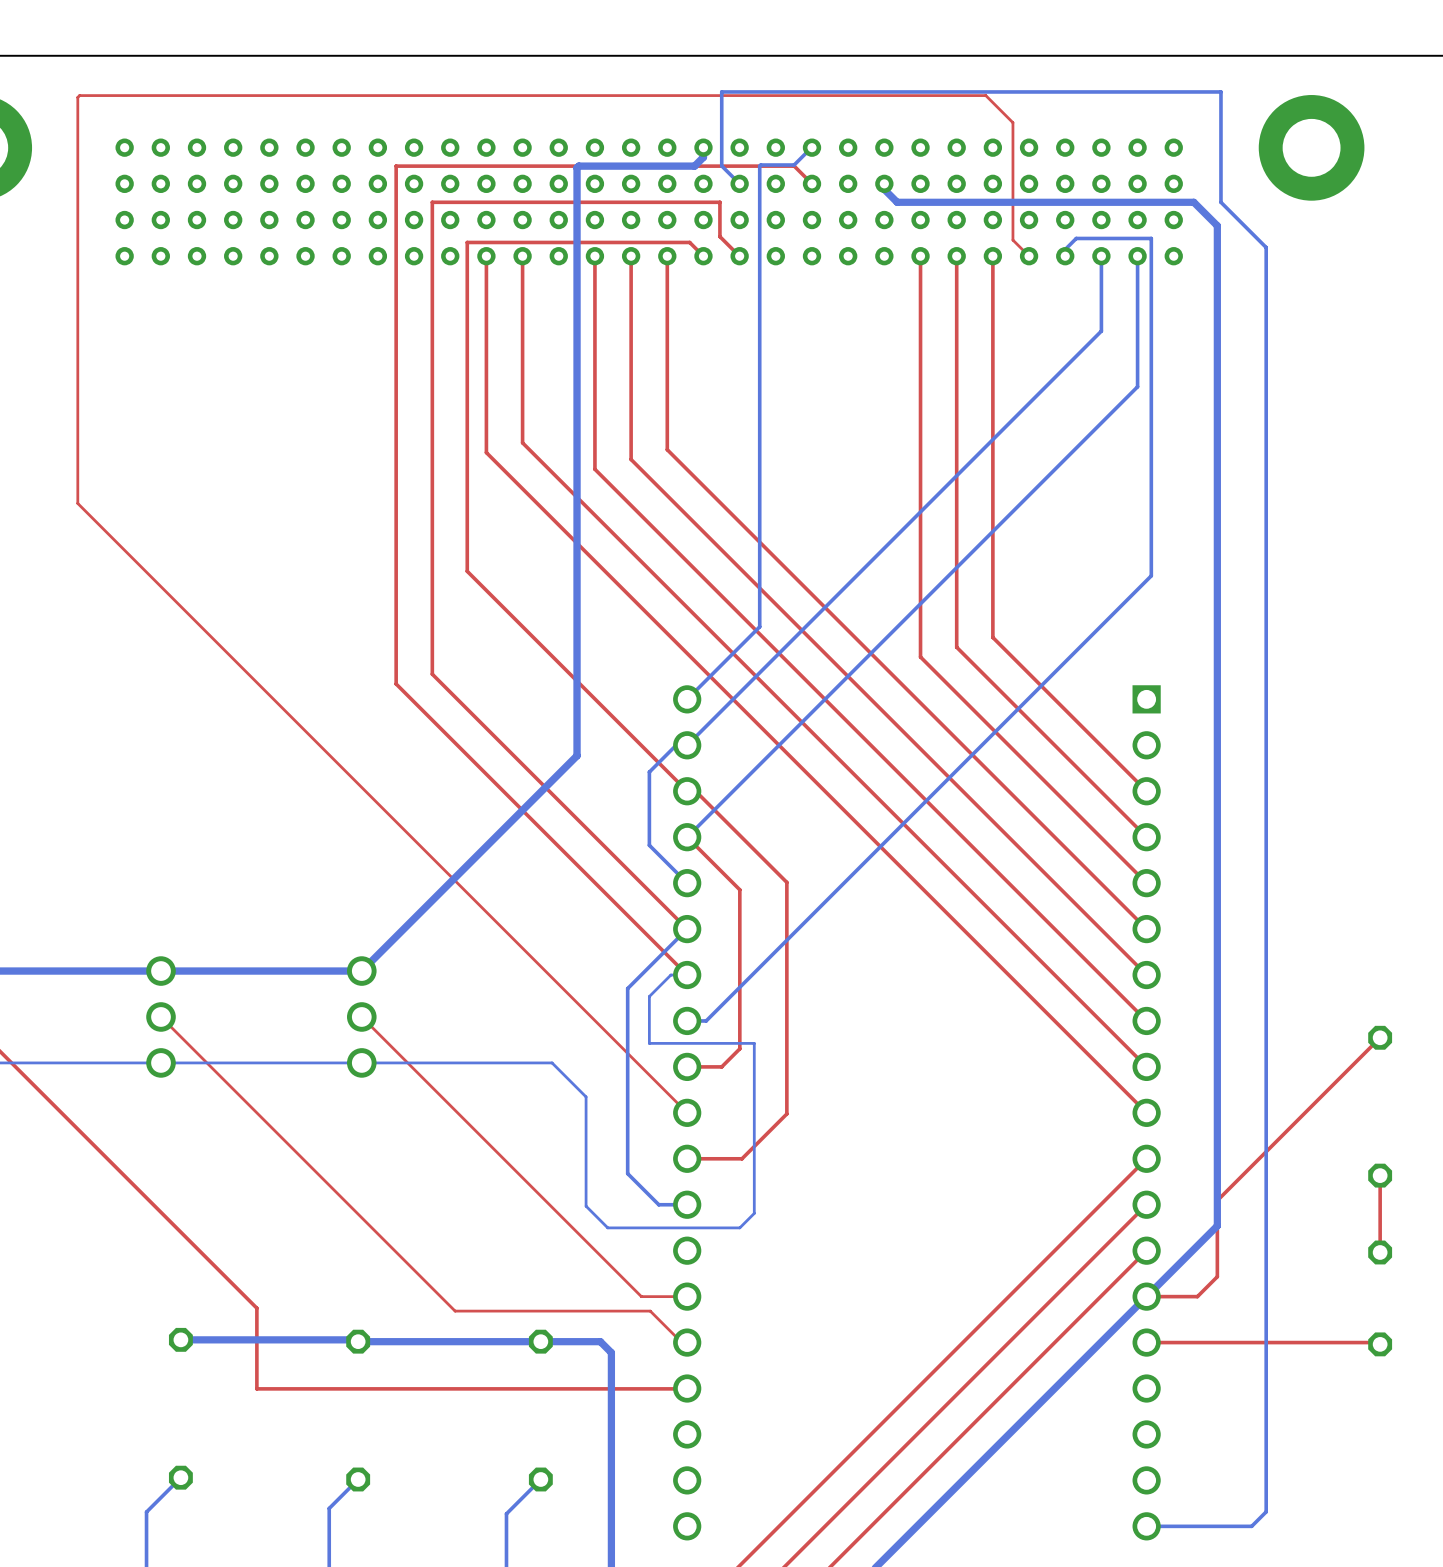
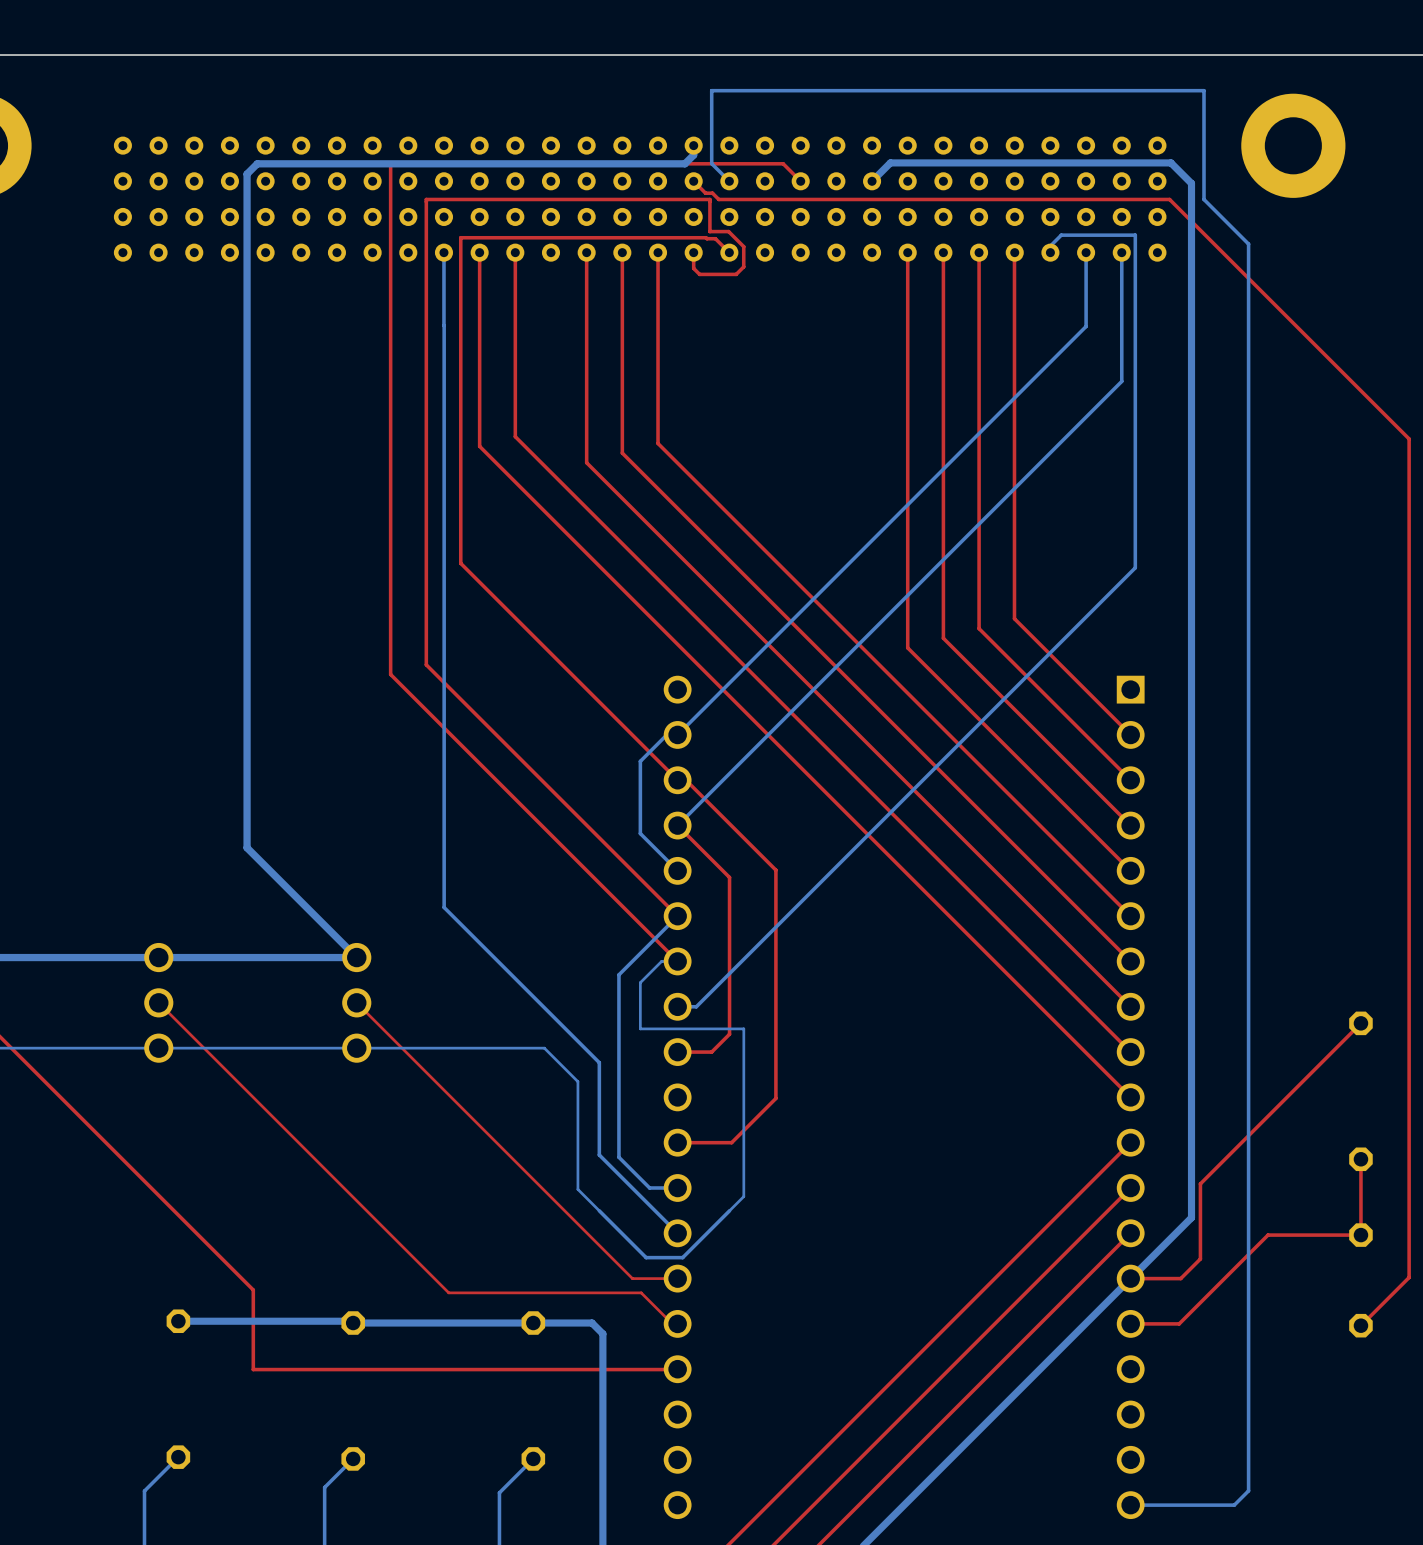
bottom track: (812, 147) (794, 165) (759, 166) (759, 626) (687, 699) -> none
bottom track: (578, 166) (577, 167) (577, 755) (361, 971) -> (570, 163) (257, 163) (247, 174) (247, 847) (356, 957)
top track: none -> (693, 181) (705, 193) (712, 193) (718, 199) (1169, 199) (1409, 438) (1409, 1277) (1360, 1325)
bottom track: (884, 183) (884, 189) (897, 202) (1193, 202) (1217, 225) (1217, 1225) (1208, 1234) -> (872, 181) (890, 162) (1171, 162) (1191, 183) (1191, 1217)
top track: (719, 234) (739, 256) -> (709, 231) (728, 231) (743, 246) (743, 266) (736, 274) (699, 274) (693, 268) (693, 252)
top track: (467, 242) (689, 242) (703, 256) -> (460, 239) (706, 237) (715, 238) (729, 252)
bottom track: none -> (443, 252) (443, 325)
top track: (1029, 256) (1012, 240) (1012, 122) (985, 95) (79, 95) (77, 97) (77, 503) (687, 1112) -> (1014, 252) (1014, 618) (1130, 734)
bottom track: none -> (444, 325) (444, 907) (599, 1062) (599, 1154) (677, 1233)
bottom track: (739, 1227) (607, 1227) -> (729, 1210) (682, 1257) (646, 1257) (599, 1210)
top track: (1195, 1342) (1378, 1342) (1380, 1344) -> (1179, 1323) (1268, 1235) (1360, 1235)

